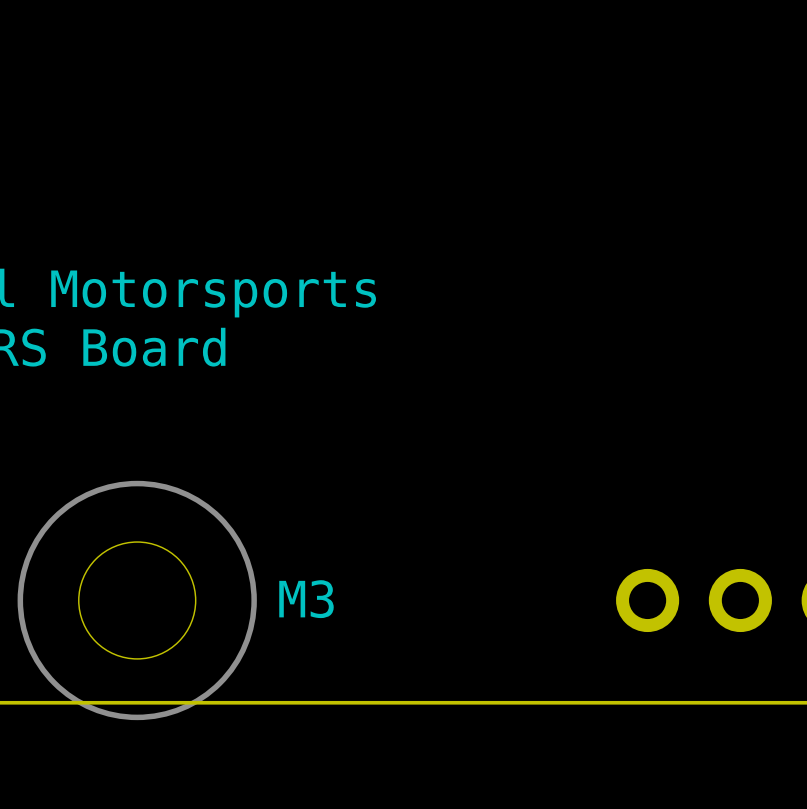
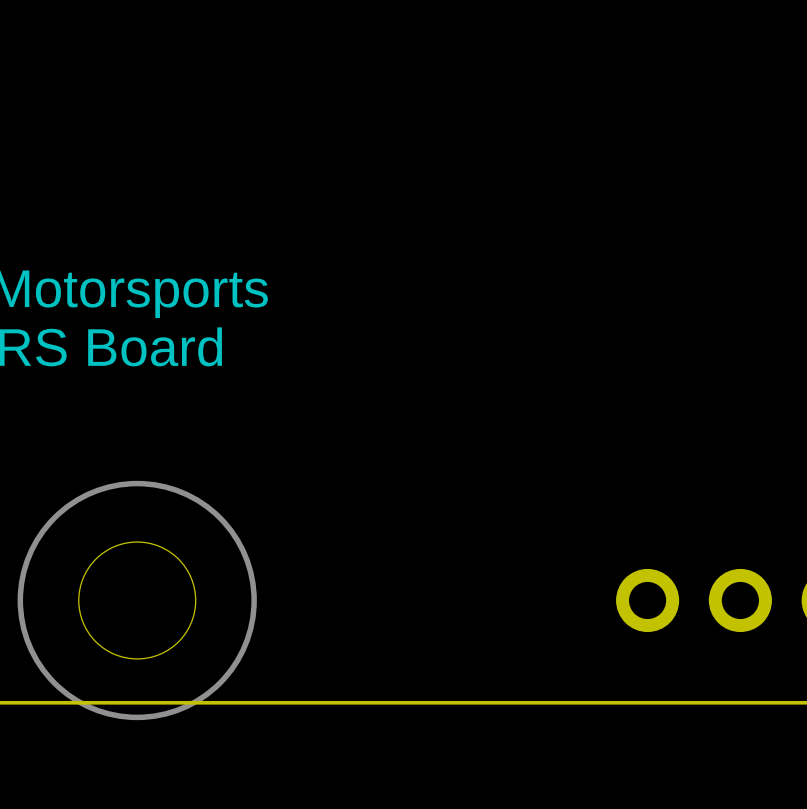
text: M3 (306, 599) -> none

